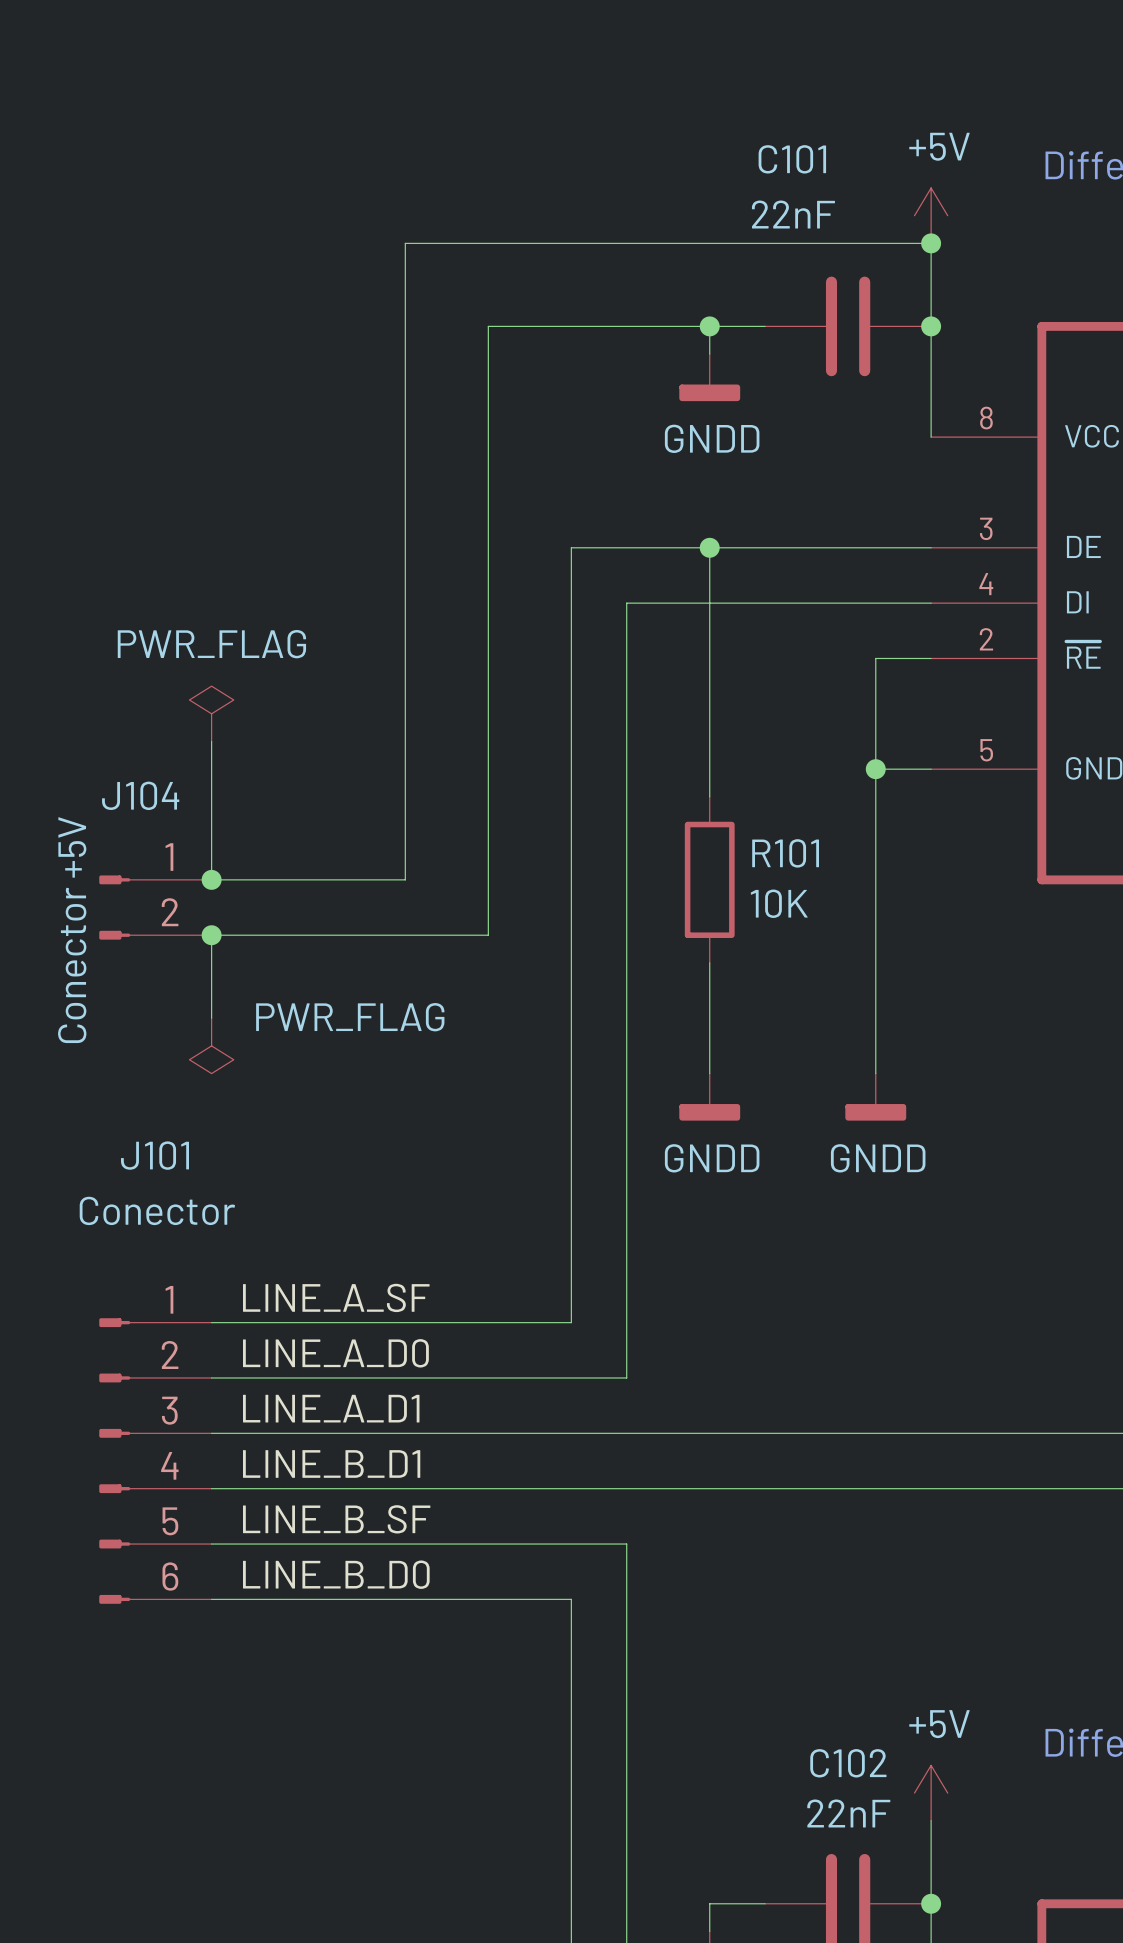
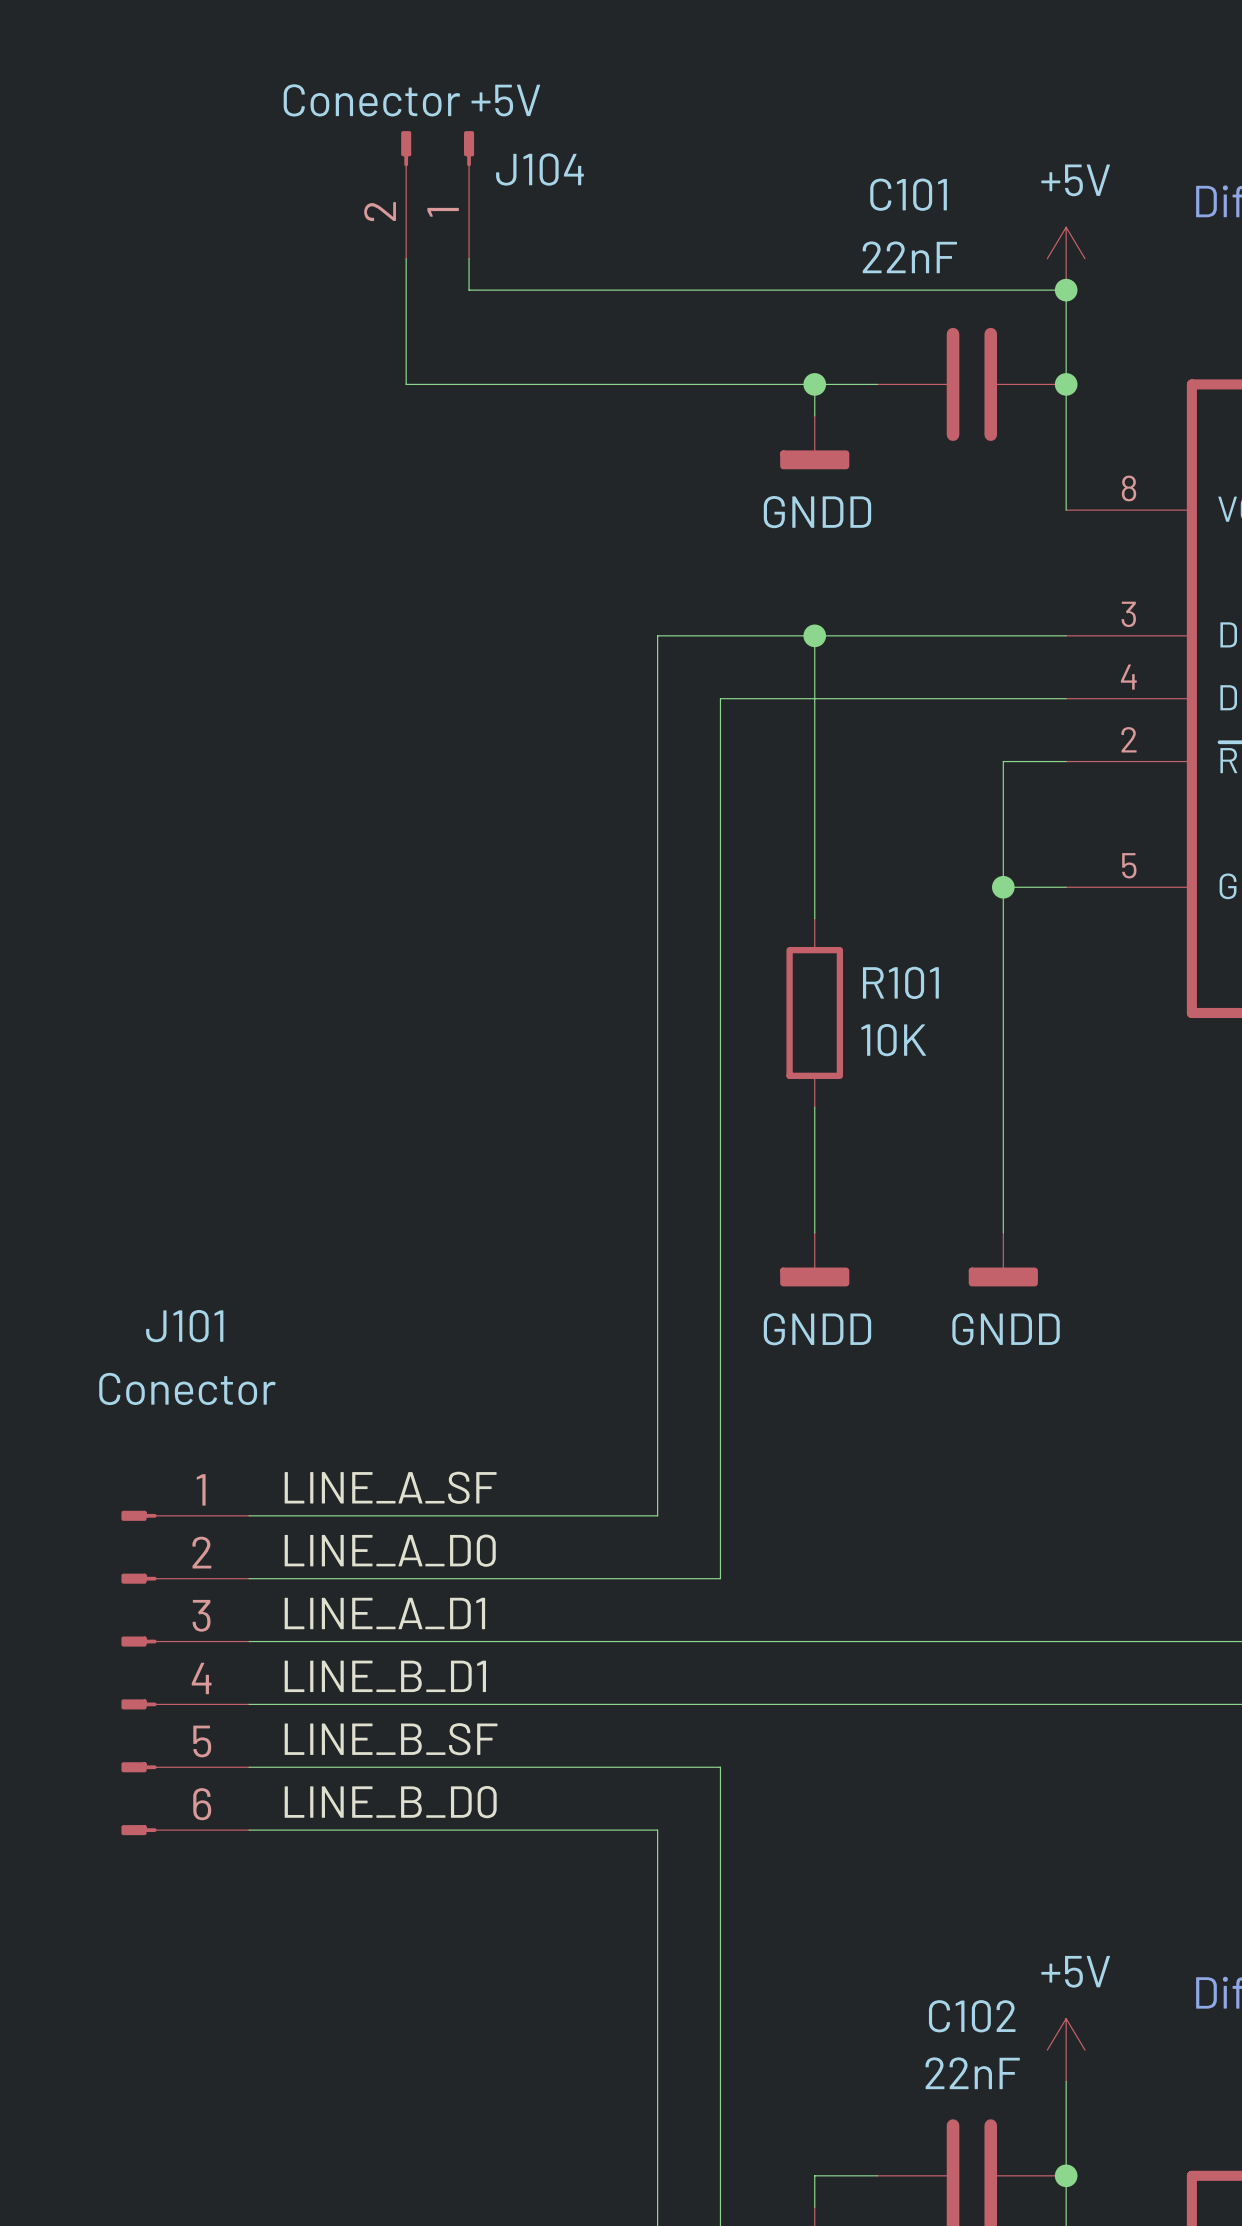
wire: (405, 243) (405, 879) (211, 879) (211, 741) -> (469, 290) (469, 258)
wire: (488, 326) (488, 935) (211, 935) (211, 1018) -> (563, 384) (406, 384) (406, 258)
power symbol: PWR_FLAG (211, 713) -> none
junction: (211, 879) -> none
J104 rotation: 0° (114, 907) -> 90° clockwise (437, 148)
J104 position: (155, 907) -> (437, 194)
junction: (211, 935) -> none
power symbol: PWR_FLAG (211, 1045) -> none

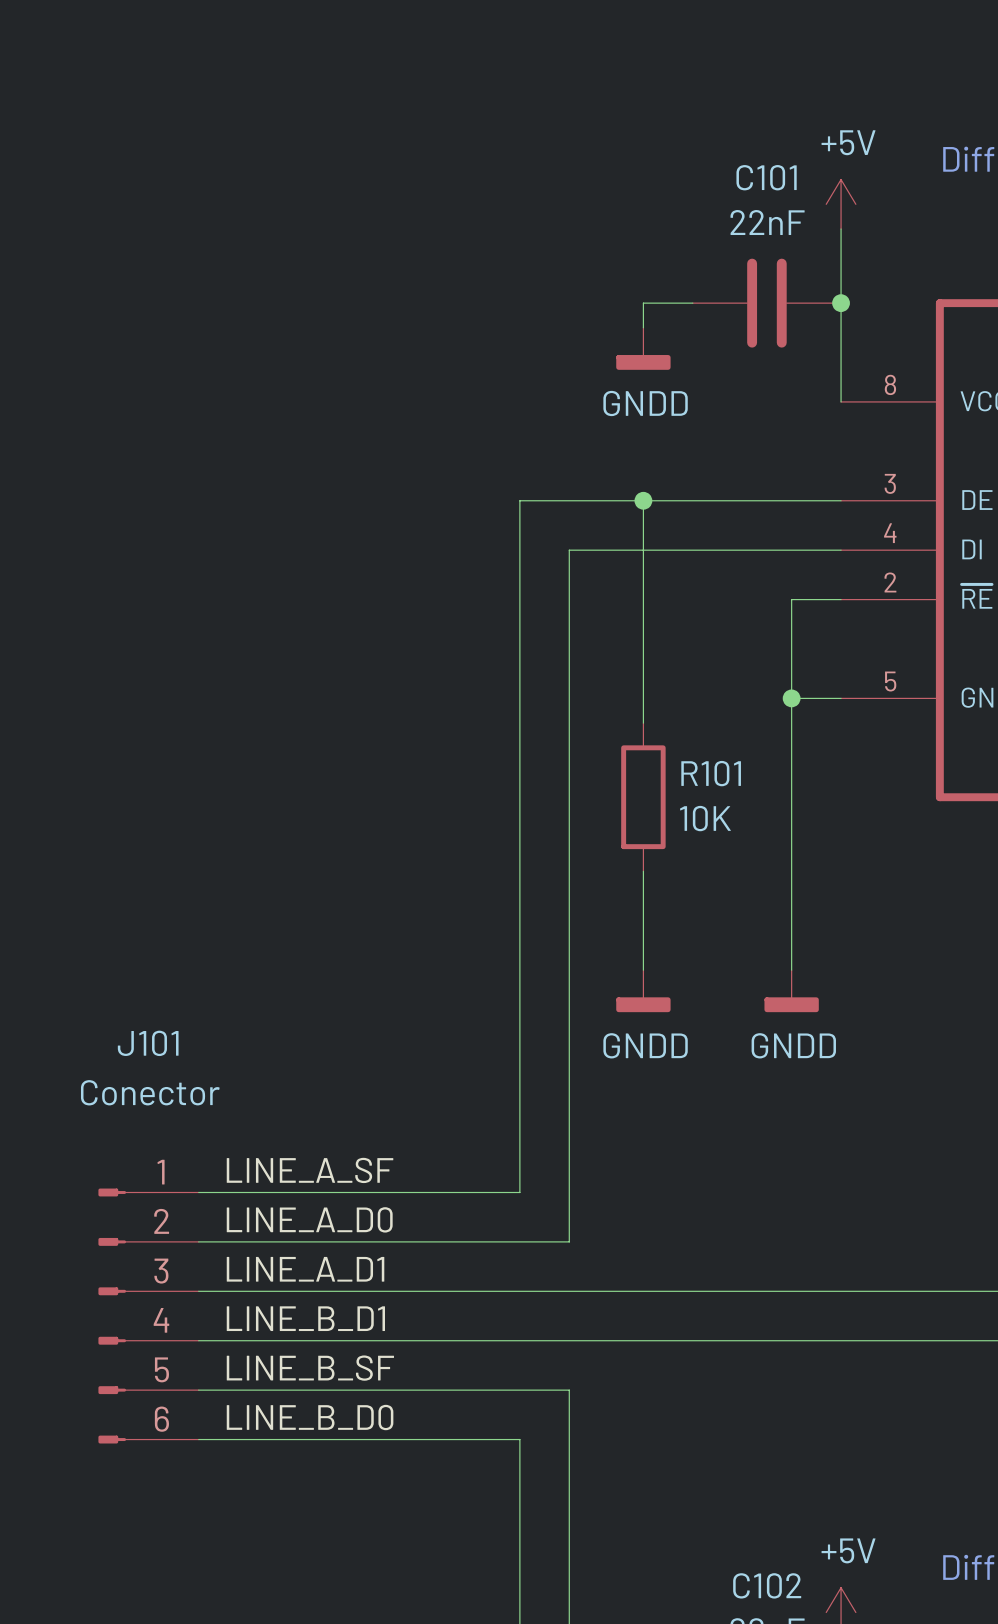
J104: Conector +5V (437, 194) -> none
C101 name position: C101 (908, 194) -> C101 (766, 177)
C101 value position: 22nF (909, 257) -> 22nF (767, 222)
wire: (406, 258) (406, 384) (814, 384) -> none
wire: (469, 258) (469, 290) (1066, 290) -> none
junction: (1066, 290) -> none
junction: (814, 384) -> none

